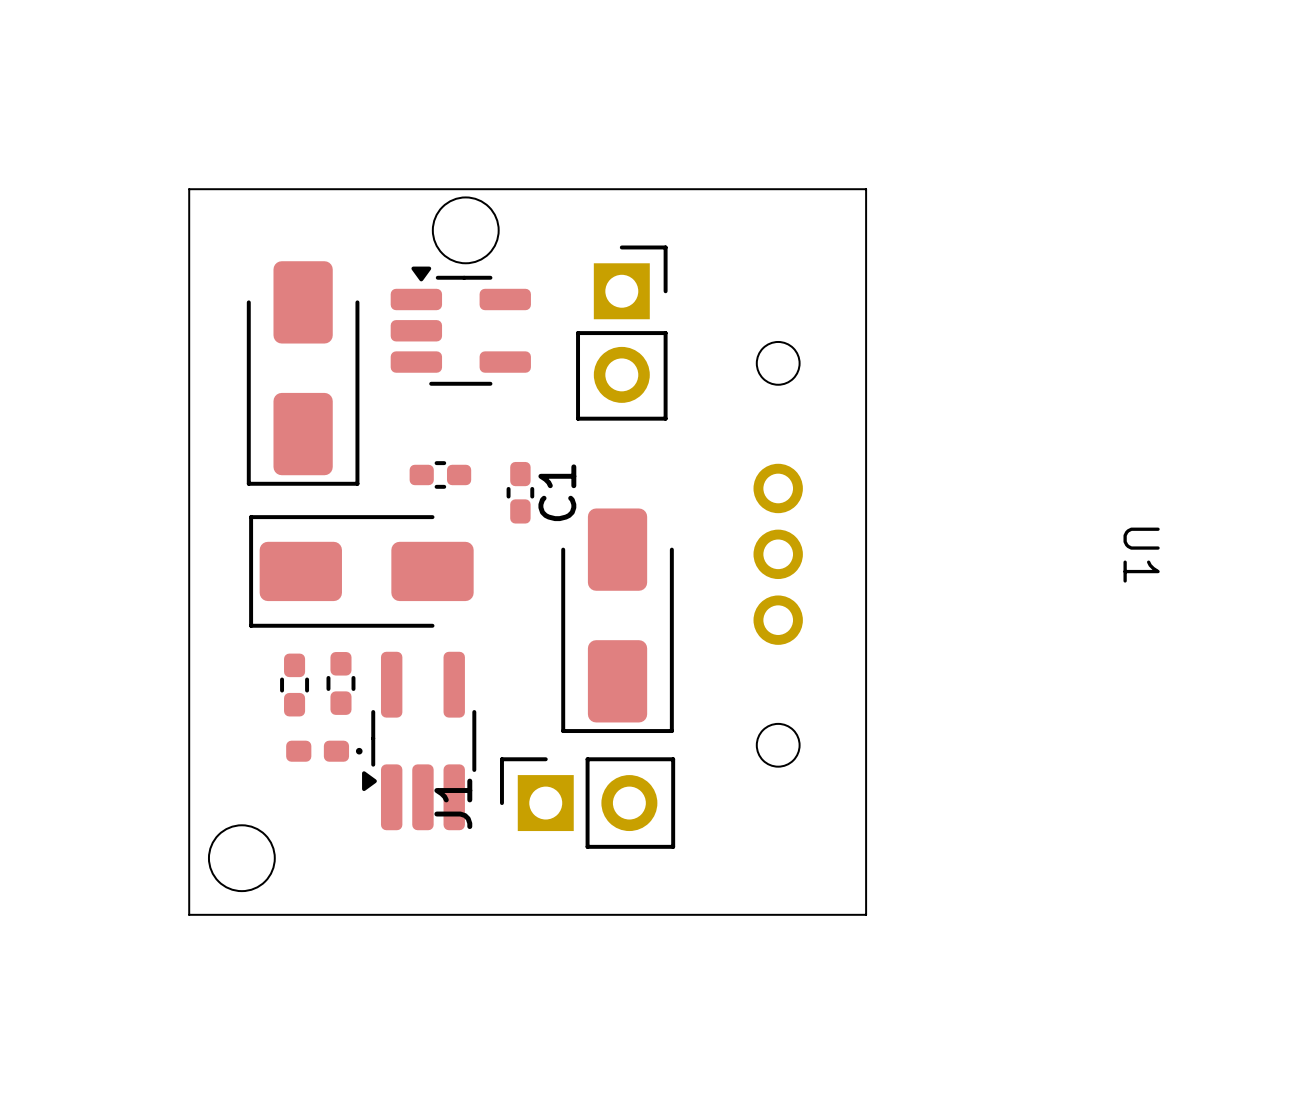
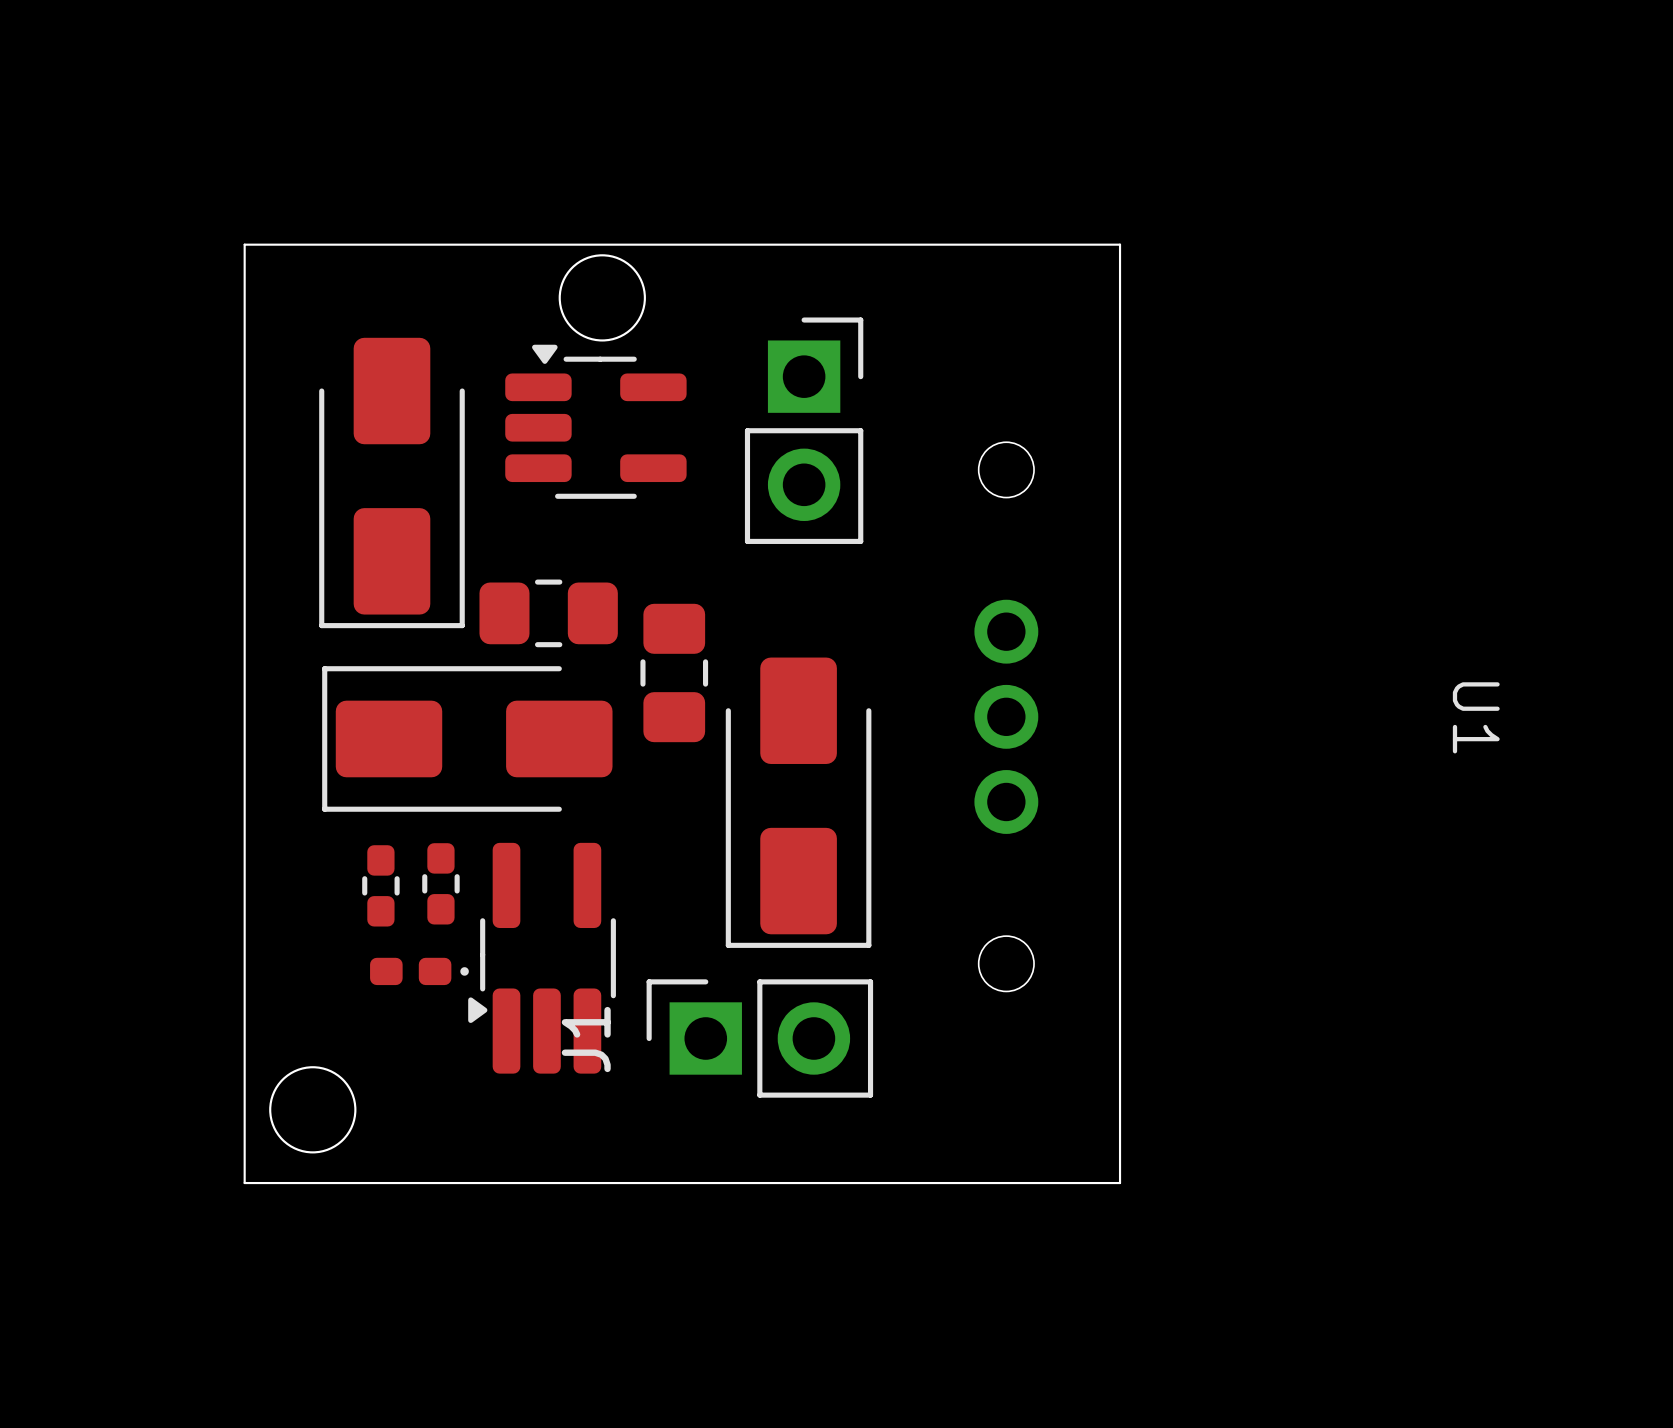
part footprint: [409, 461, 472, 489] -> [479, 579, 618, 648]
C1: (520, 492) -> none
part: none -> (674, 672)

